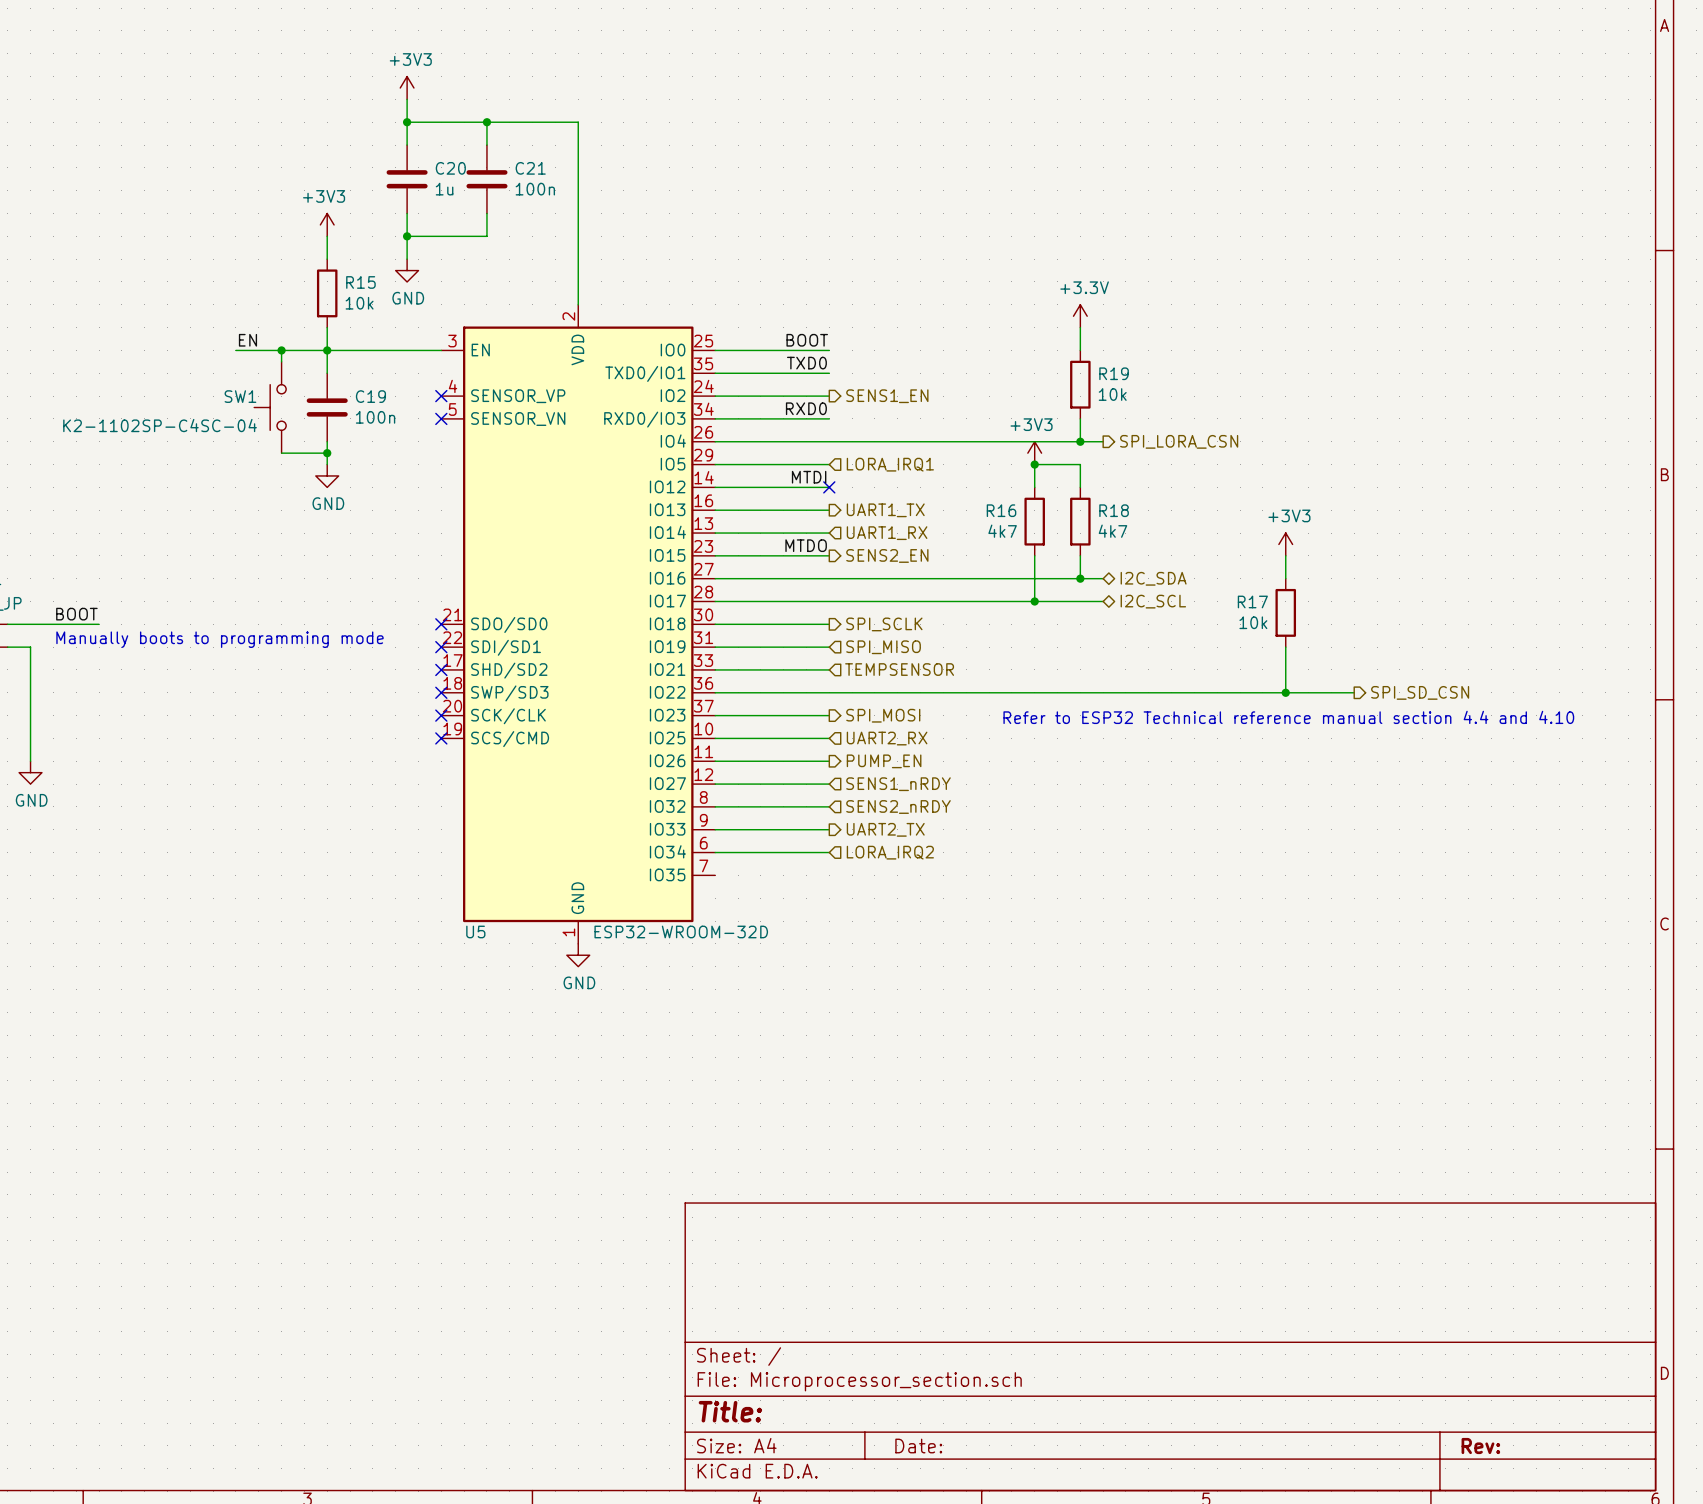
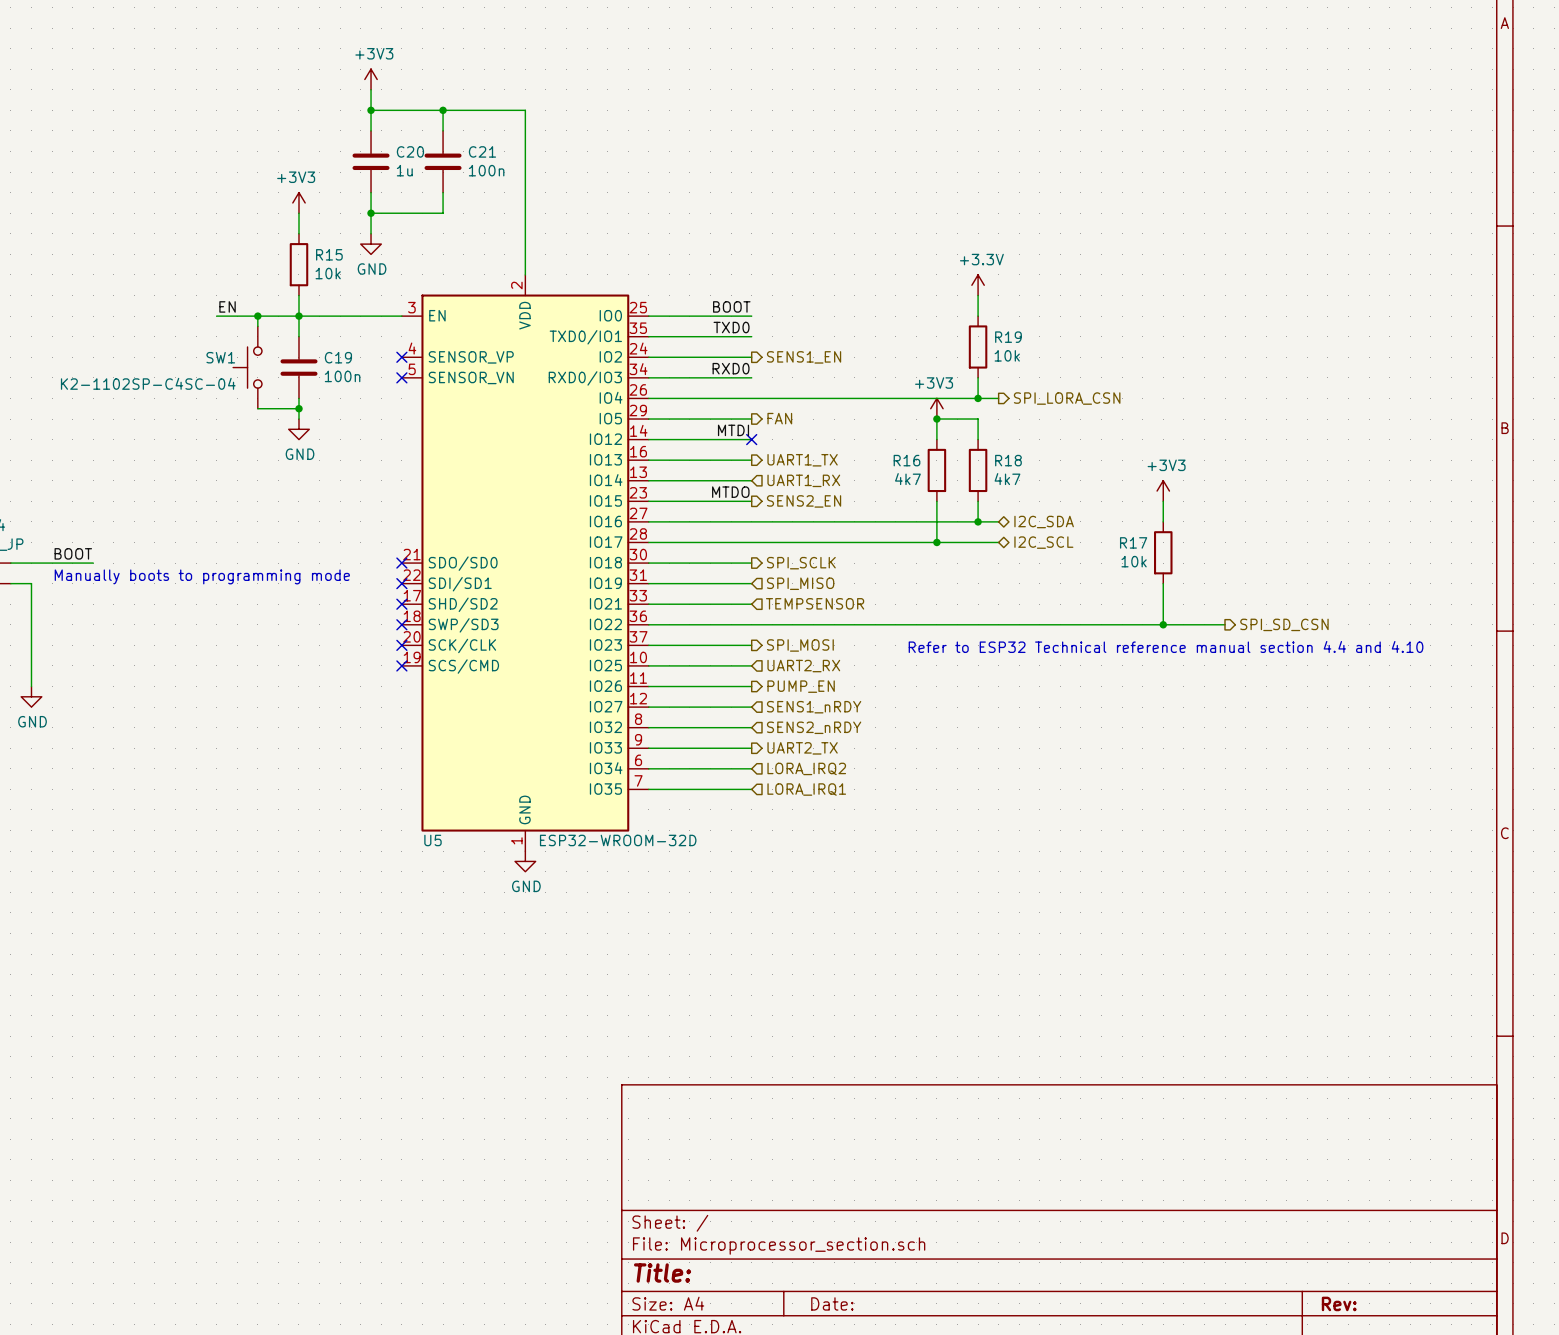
hierarchical label shape: input (890, 464) -> output (779, 418)
hierarchical label: LORA_IRQ1 (890, 464) -> FAN (779, 418)
wire: none -> (648, 789) (751, 789)
hierarchical label: none -> LORA_IRQ1 (806, 789)

